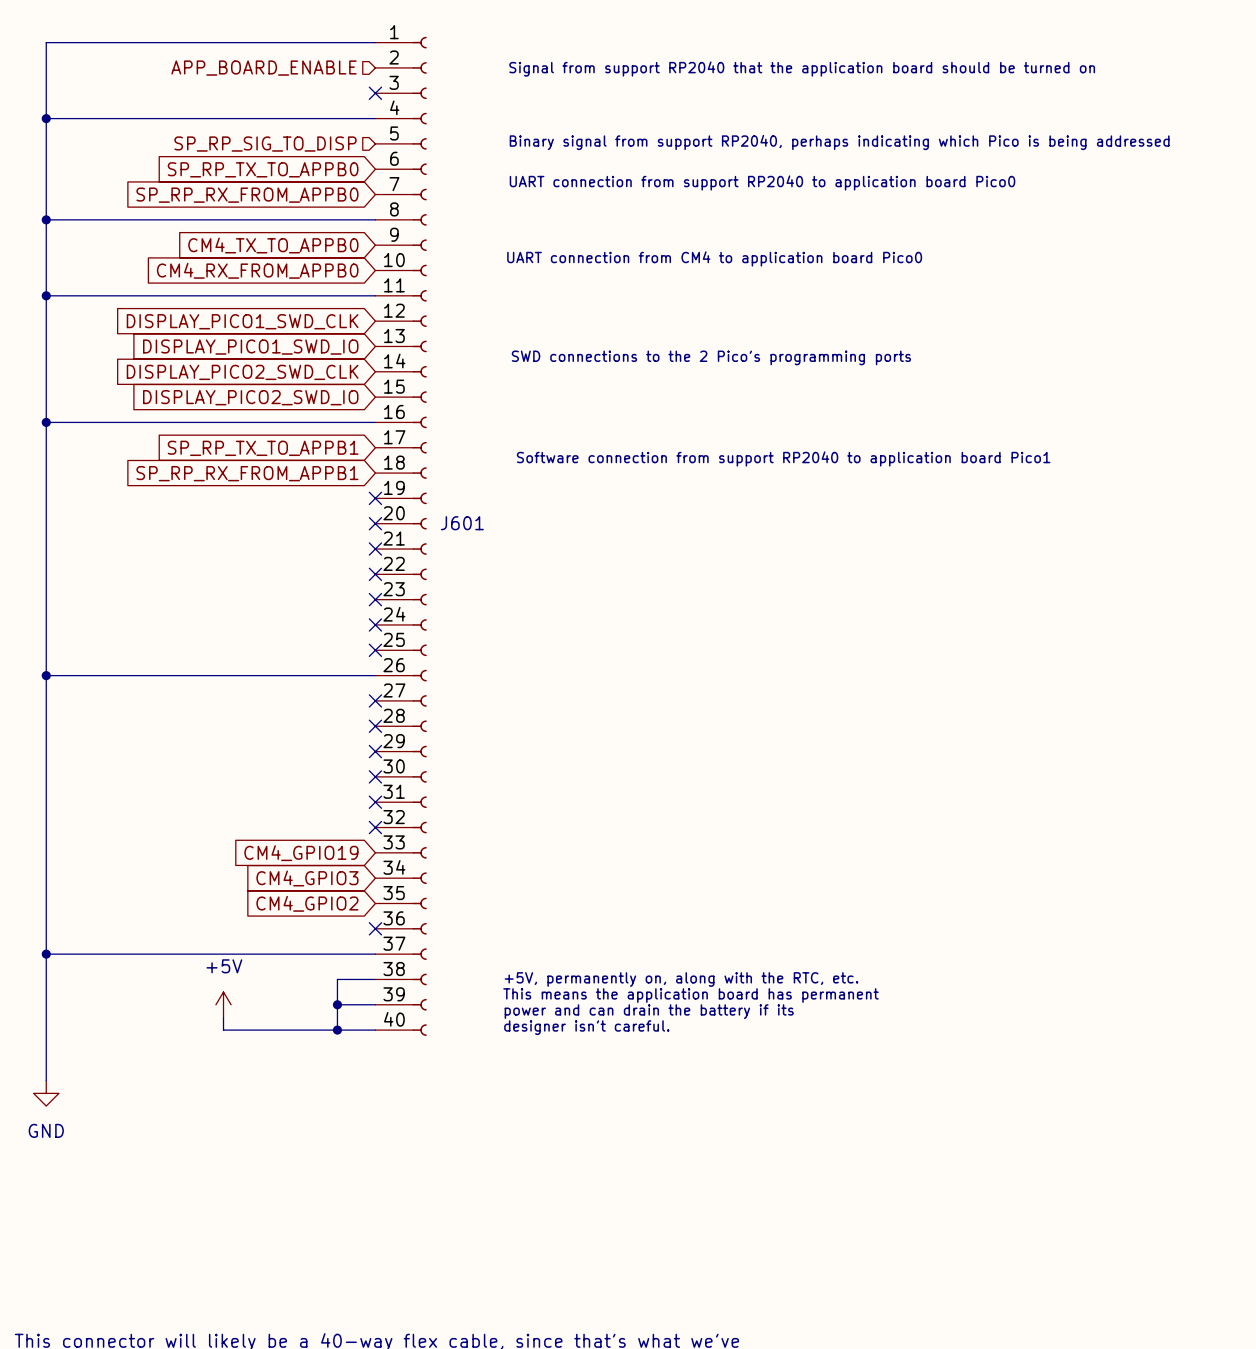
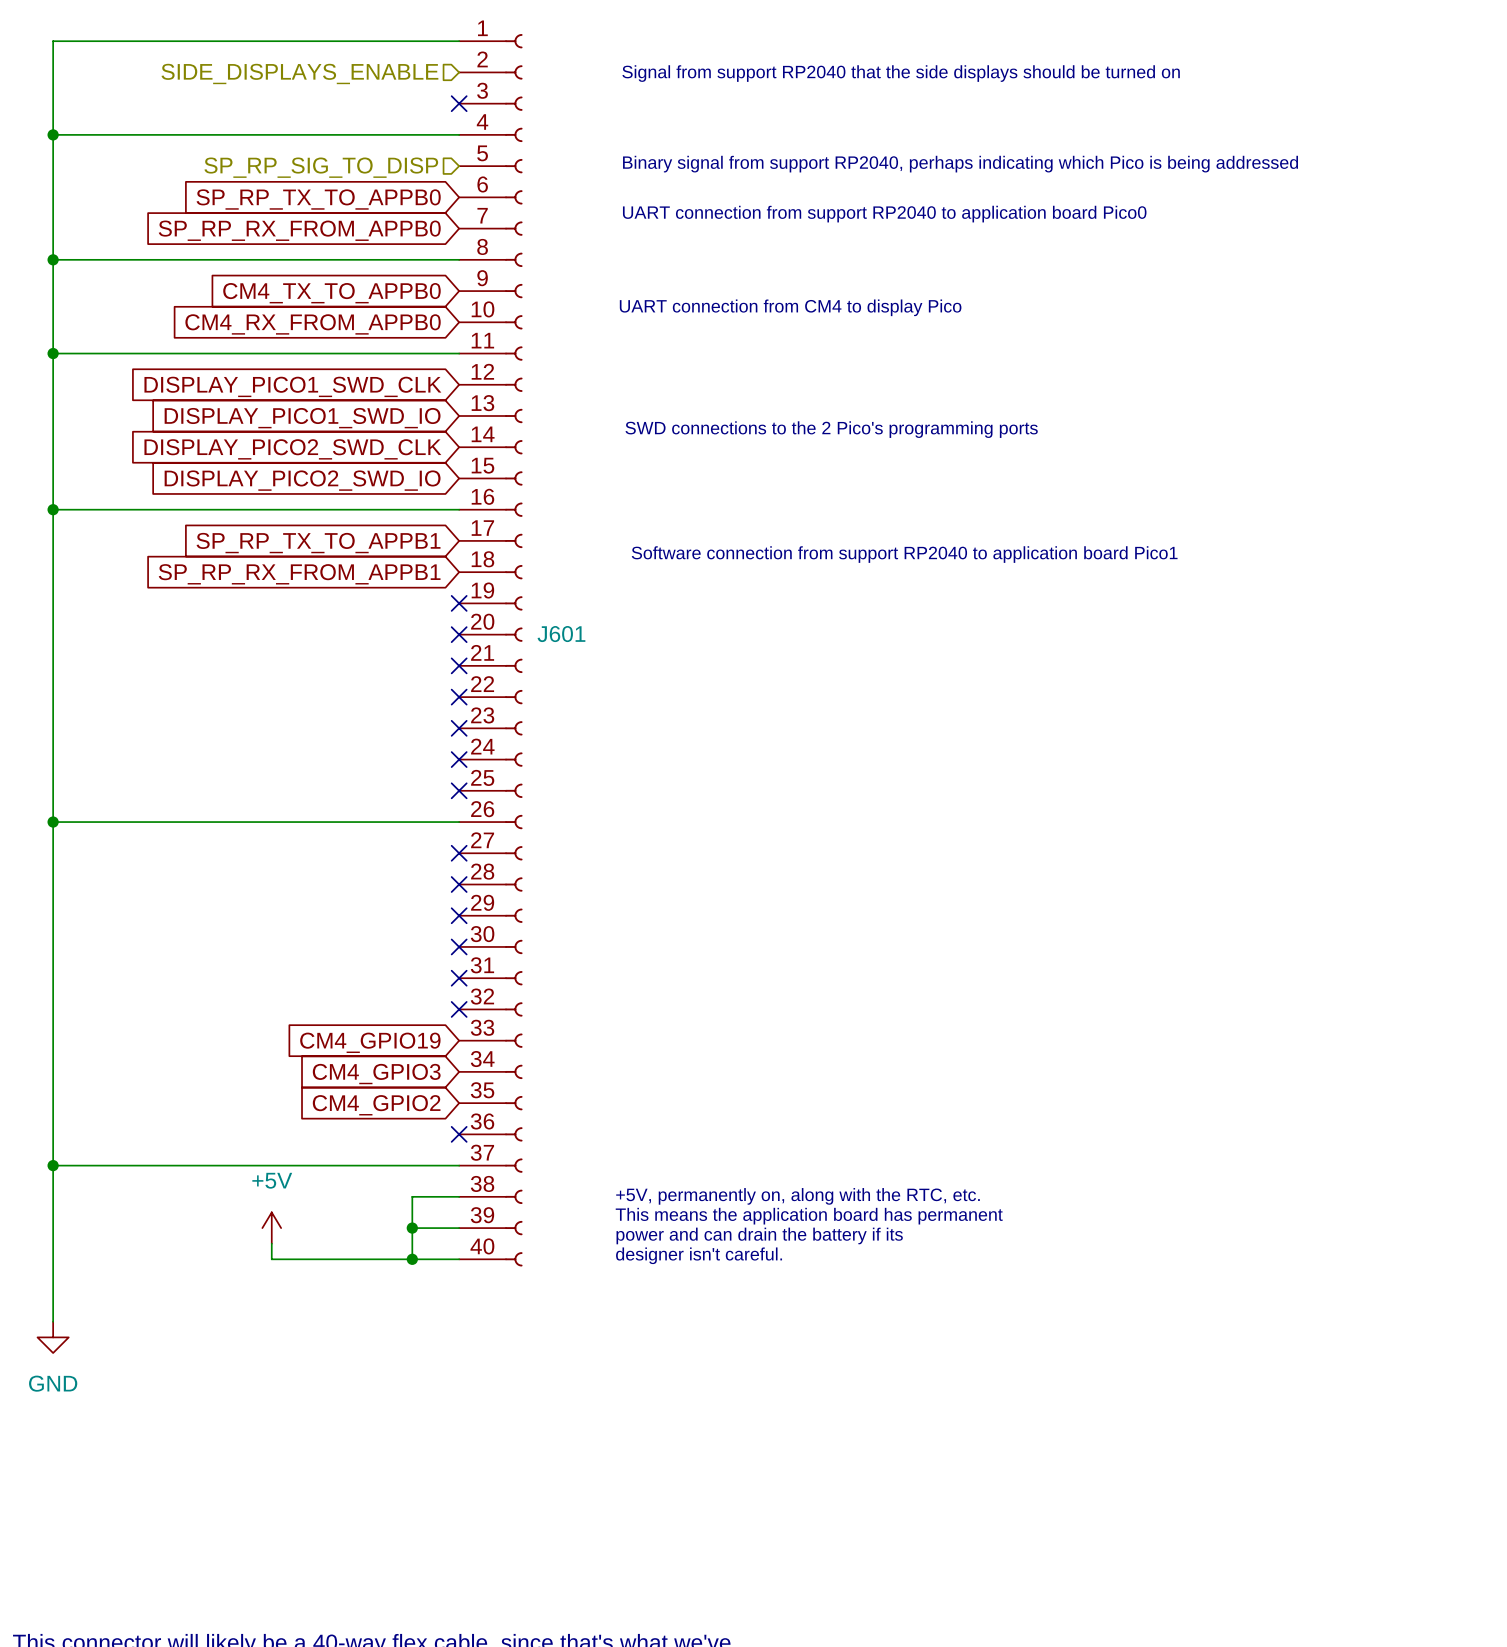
hierarchical label: APP_BOARD_ENABLE (264, 68) -> SIDE_DISPLAYS_ENABLE (299, 73)
text: Signal from support RP2040 that the application board should be turned on (802, 69) -> Signal from support RP2040 that the side displays should be turned on (901, 73)
text: UART connection from CM4 to application board Pico0 (714, 258) -> UART connection from CM4 to display Pico (790, 307)

